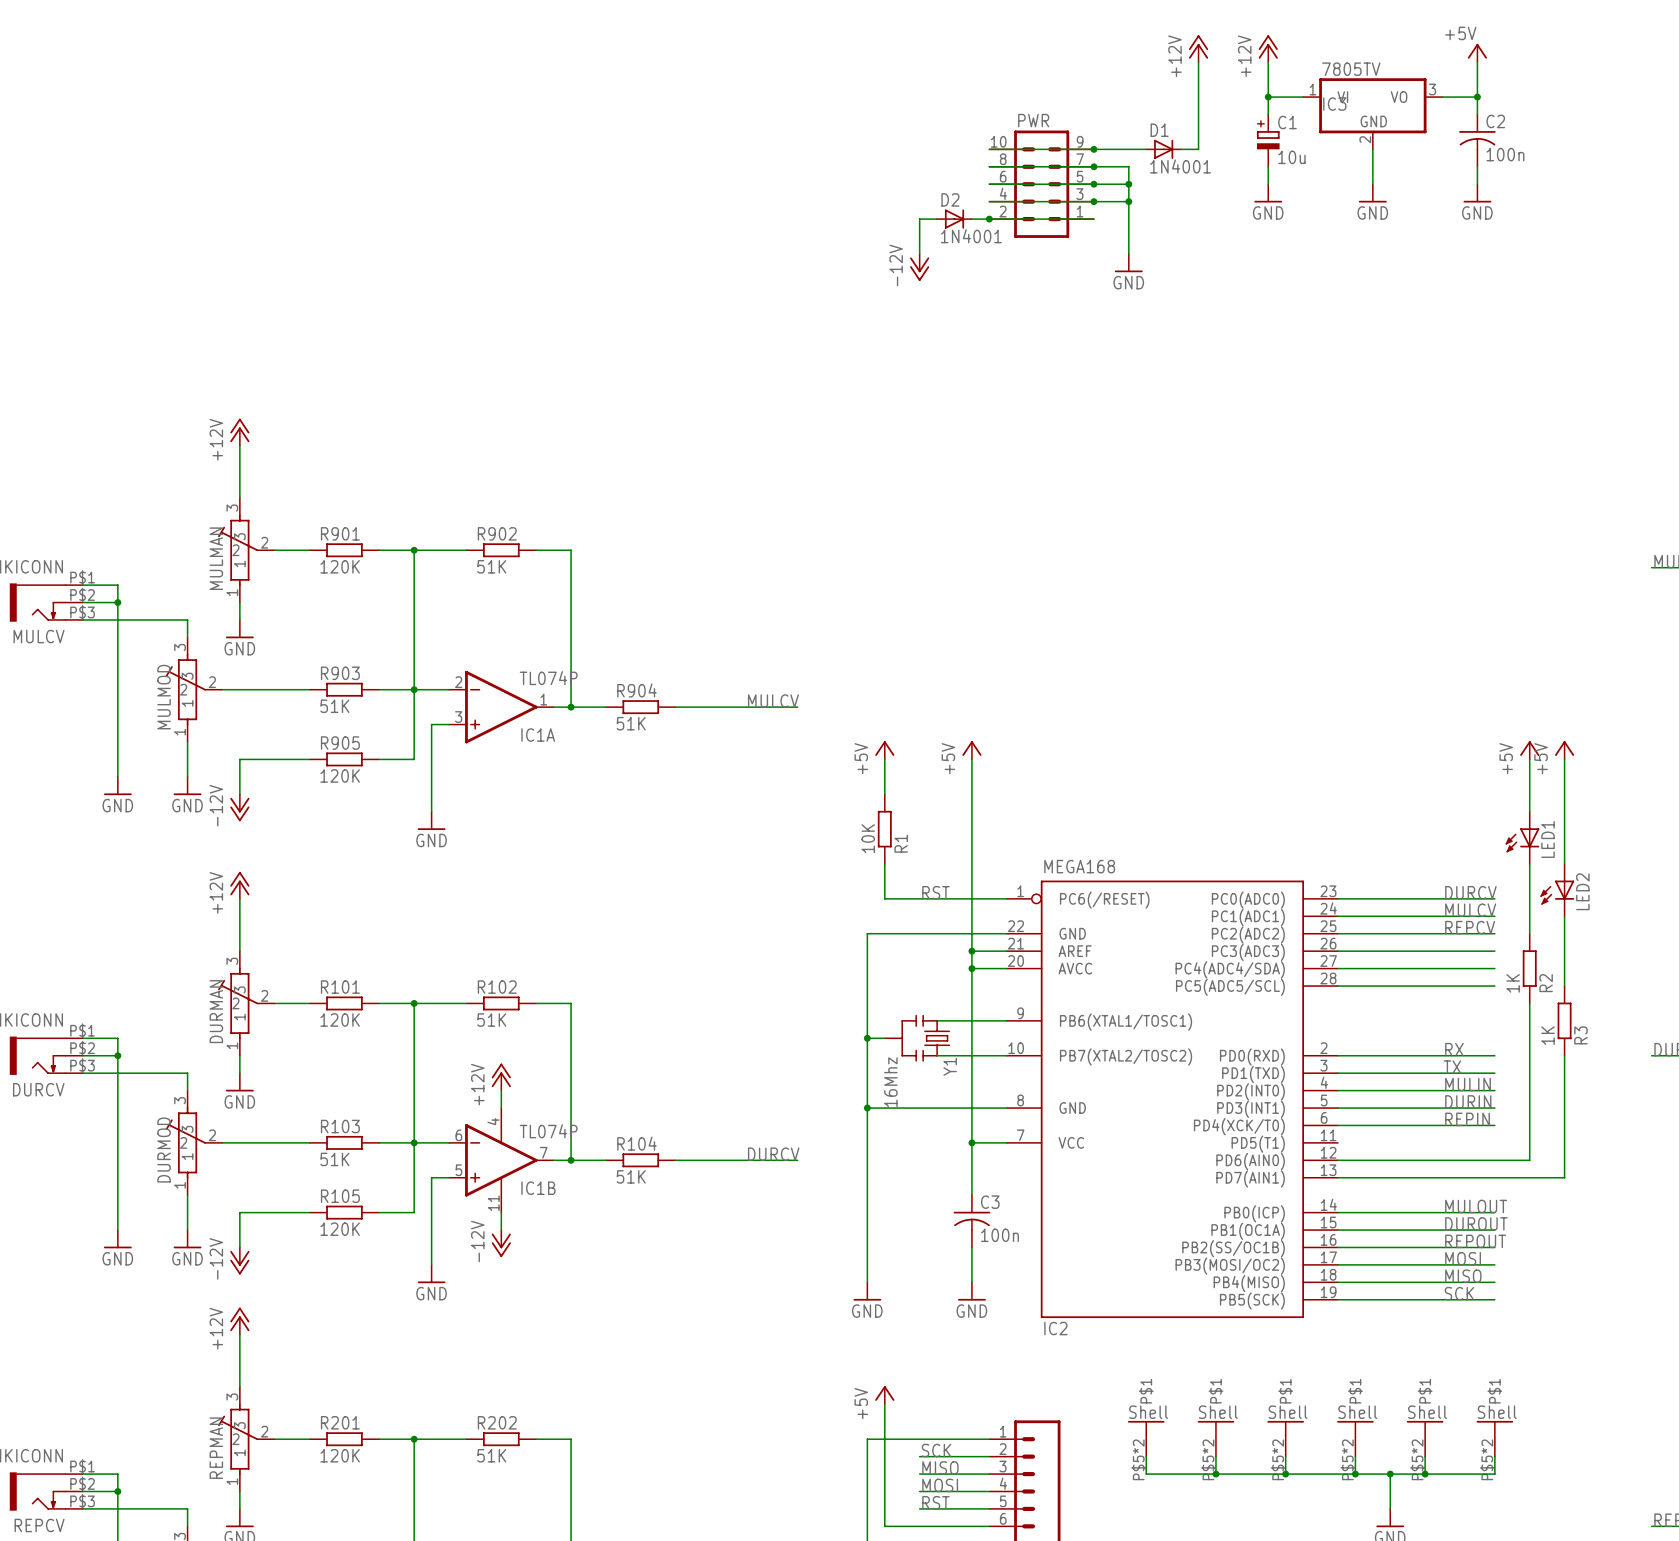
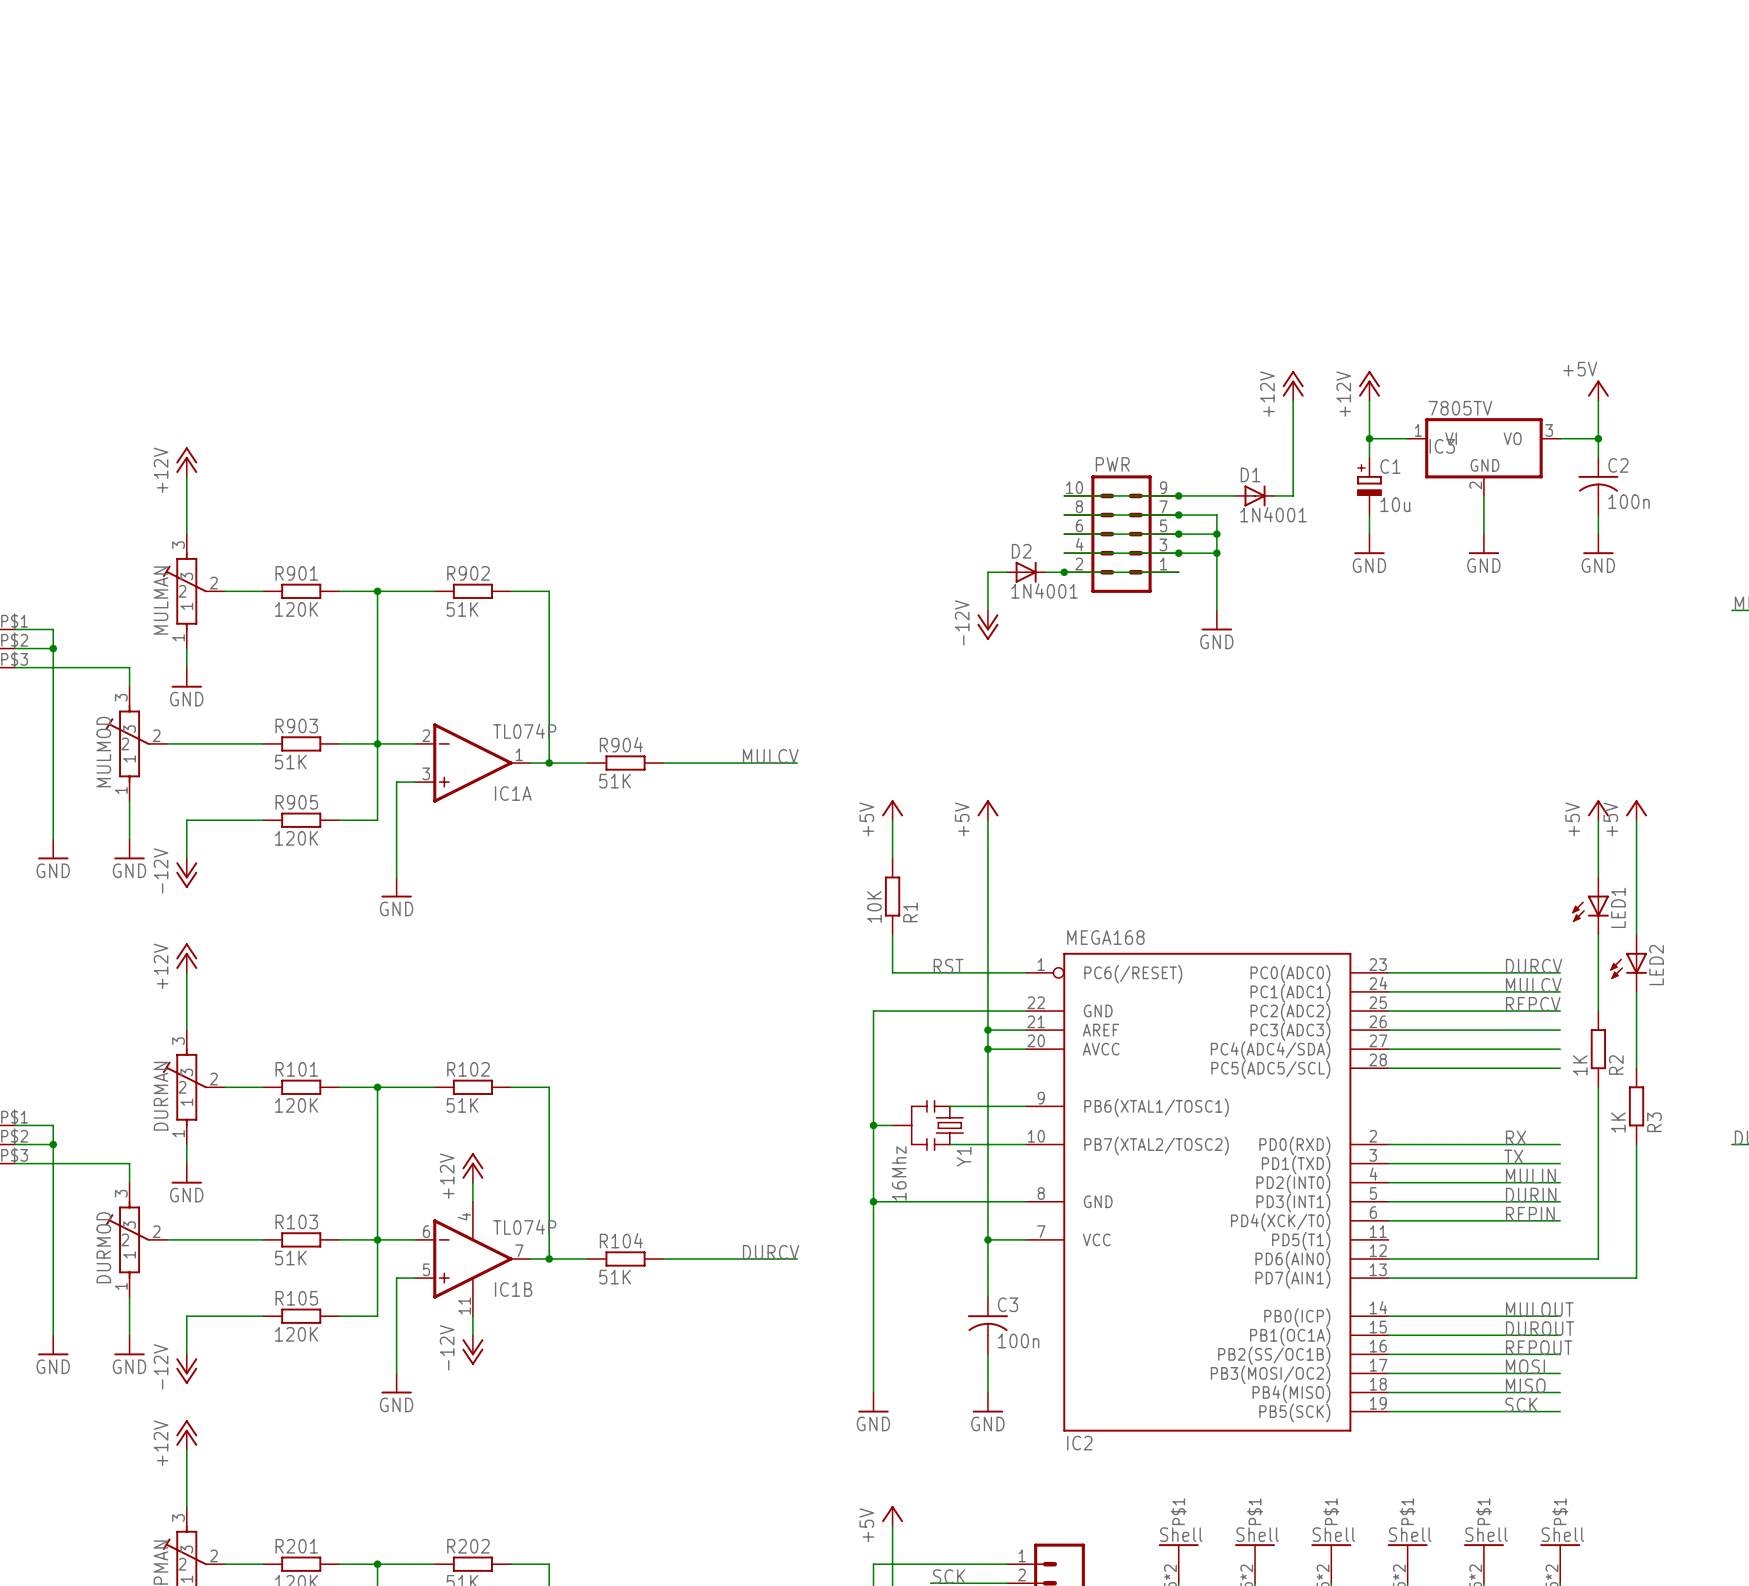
power symbol: +12V (1198, 48) -> none
power symbol: +12V (1268, 48) -> none
power symbol: +5V (1477, 53) -> none
wire: (1198, 62) (1198, 149) (1181, 149) -> none
wire: (1268, 62) (1268, 114) -> none
wire: (1477, 62) (1477, 114) -> none
wire: (1268, 97) (1303, 97) -> none
junction: (1268, 97) -> none
wire: (1442, 97) (1477, 97) -> none
junction: (1477, 97) -> none
IC3 position: (1372, 113) -> (1483, 457)
C1 position: (1268, 140) -> (1369, 486)
C2 position: (1477, 140) -> (1598, 486)
wire: (989, 149) (1146, 149) -> none
junction: (1093, 149) -> none
D1 position: (1163, 149) -> (1255, 495)
wire: (1372, 149) (1372, 184) -> none
wire: (989, 166) (1128, 166) (1128, 253) -> none
junction: (1093, 166) -> none
wire: (1268, 166) (1268, 184) -> none
wire: (1477, 166) (1477, 184) -> none
wire: (989, 184) (1128, 184) -> none
PWR: (1041, 184) -> none
junction: (1093, 184) -> none
junction: (1128, 184) -> none
power symbol: GND (1268, 193) -> none
power symbol: GND (1372, 193) -> none
power symbol: GND (1477, 193) -> none
wire: (989, 201) (1128, 201) -> none
junction: (1093, 201) -> none
junction: (1128, 201) -> none
wire: (937, 219) (919, 219) (919, 253) -> none
D2 position: (954, 219) -> (1026, 572)
wire: (971, 219) (1093, 219) -> none
junction: (989, 219) -> none
power symbol: GND (1128, 263) -> none
power symbol: -12V (919, 267) -> none
power symbol: none -> +12V (1293, 385)
power symbol: none -> +12V (1369, 385)
power symbol: none -> +5V (1598, 390)
wire: none -> (1293, 400) (1293, 495) (1274, 495)
wire: none -> (1369, 400) (1369, 457)
wire: none -> (1598, 400) (1598, 457)
wire: none -> (1369, 438) (1407, 438)
junction: none -> (1369, 438)
wire: none -> (1560, 438) (1598, 438)
junction: none -> (1598, 438)
wire: none -> (1064, 495) (1235, 495)
junction: none -> (1178, 495)
wire: none -> (1483, 495) (1483, 534)
wire: none -> (1064, 515) (1216, 515) (1216, 610)
junction: none -> (1178, 515)
wire: none -> (1369, 515) (1369, 534)
wire: none -> (1598, 515) (1598, 534)
wire: none -> (1064, 534) (1216, 534)
PWR: none -> (1121, 534)
junction: none -> (1178, 534)
junction: none -> (1216, 534)
power symbol: none -> GND (1369, 544)
power symbol: none -> GND (1483, 544)
power symbol: none -> GND (1598, 544)
wire: none -> (1064, 553) (1216, 553)
junction: none -> (1178, 553)
junction: none -> (1216, 553)
wire: none -> (1007, 572) (987, 572) (987, 610)
wire: none -> (1045, 572) (1178, 572)
junction: none -> (1064, 572)
power symbol: none -> GND (1216, 620)
power symbol: none -> -12V (987, 625)

